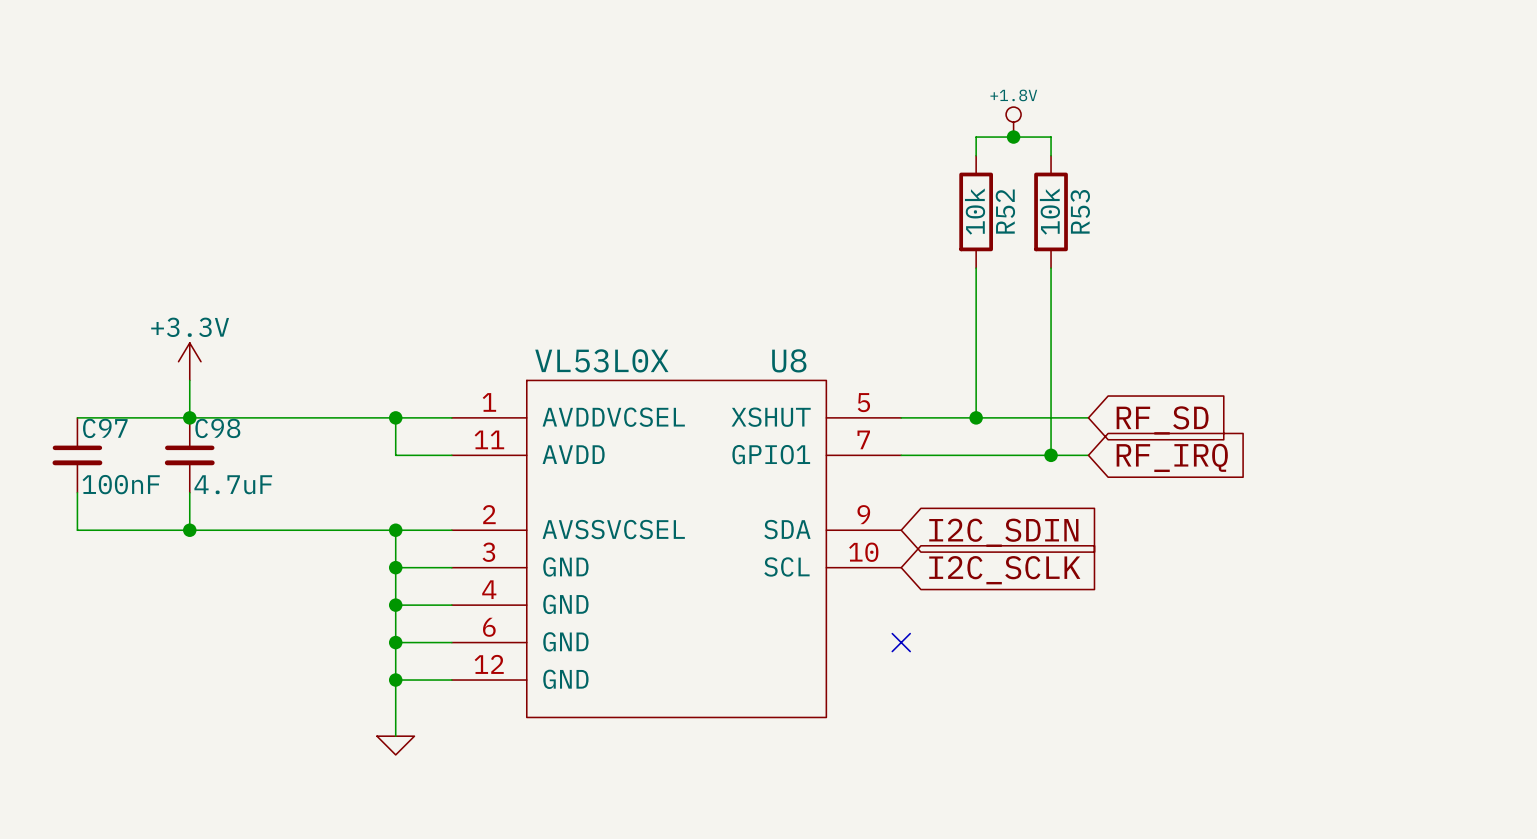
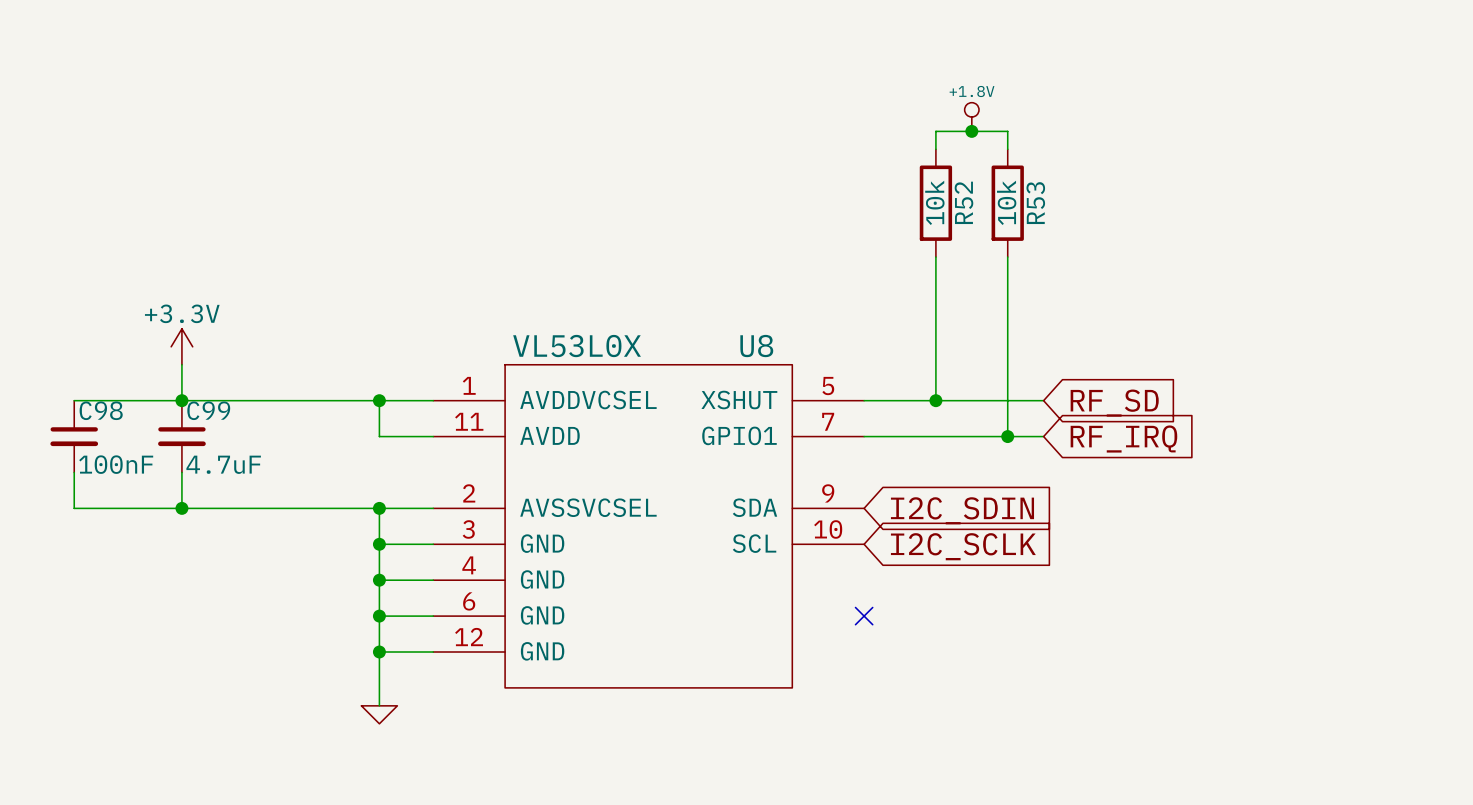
C97 name: C97 (105, 428) -> C98 (101, 410)
C98 name: C98 (217, 428) -> C99 (208, 410)

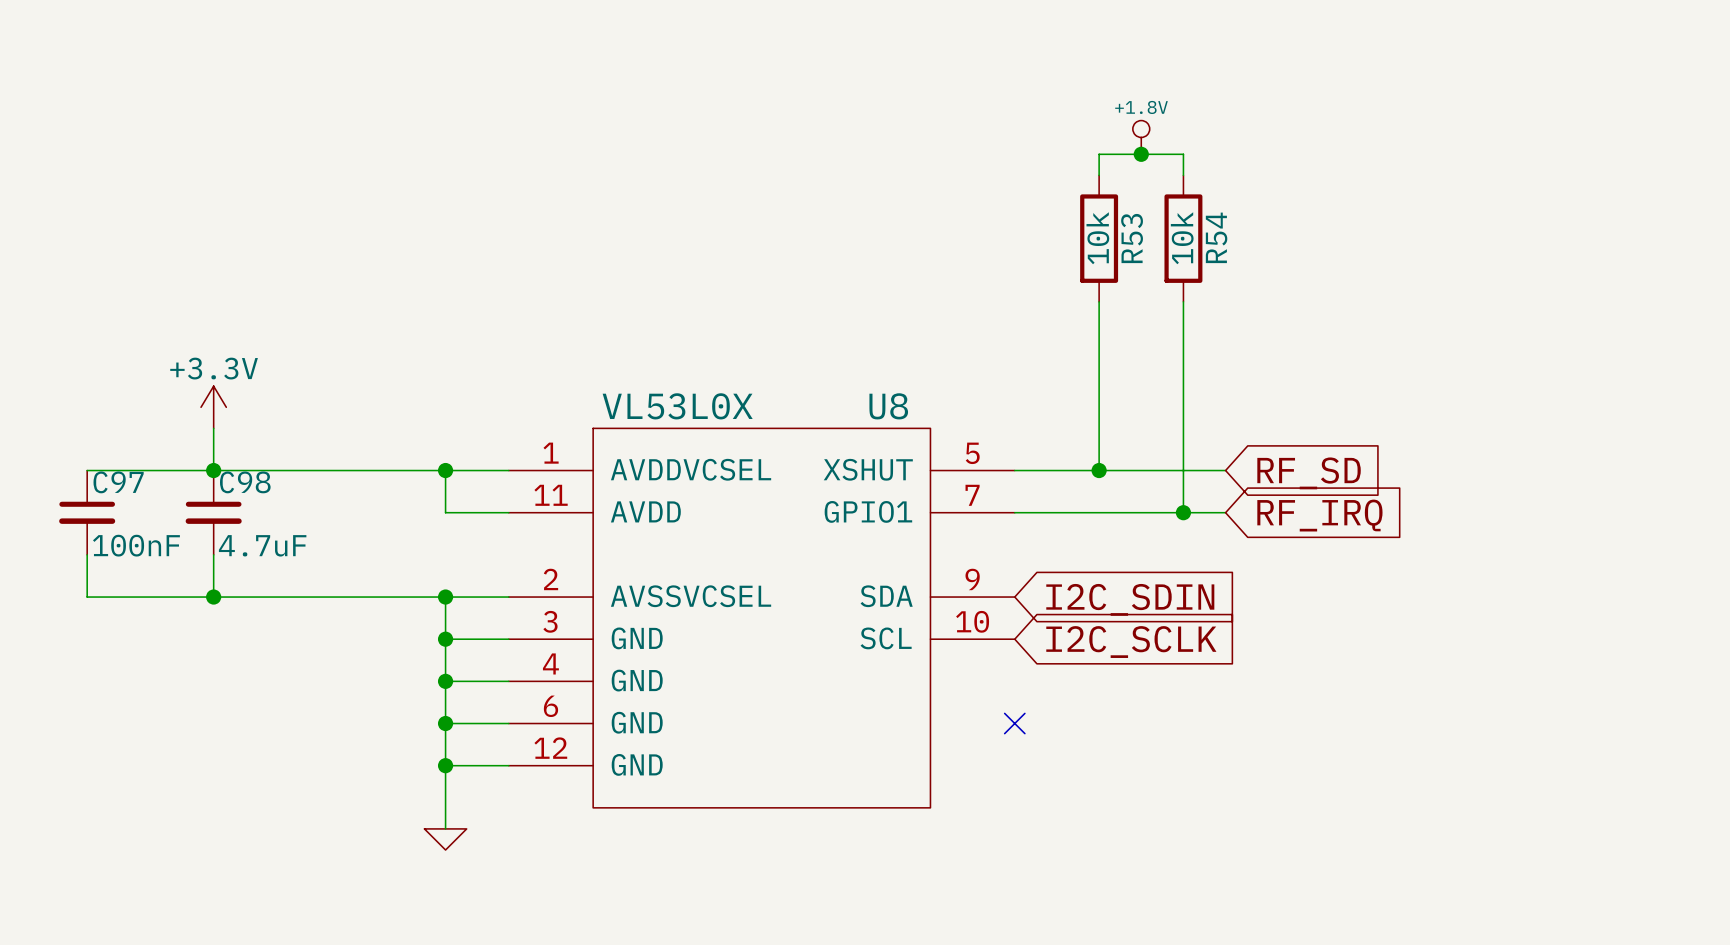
R52 name: R52 (963, 202) -> R53 (1132, 238)
R53 name: R53 (1035, 203) -> R54 (1216, 237)
C98 name: C98 (101, 410) -> C97 (118, 482)
C99 name: C99 (208, 410) -> C98 (245, 482)

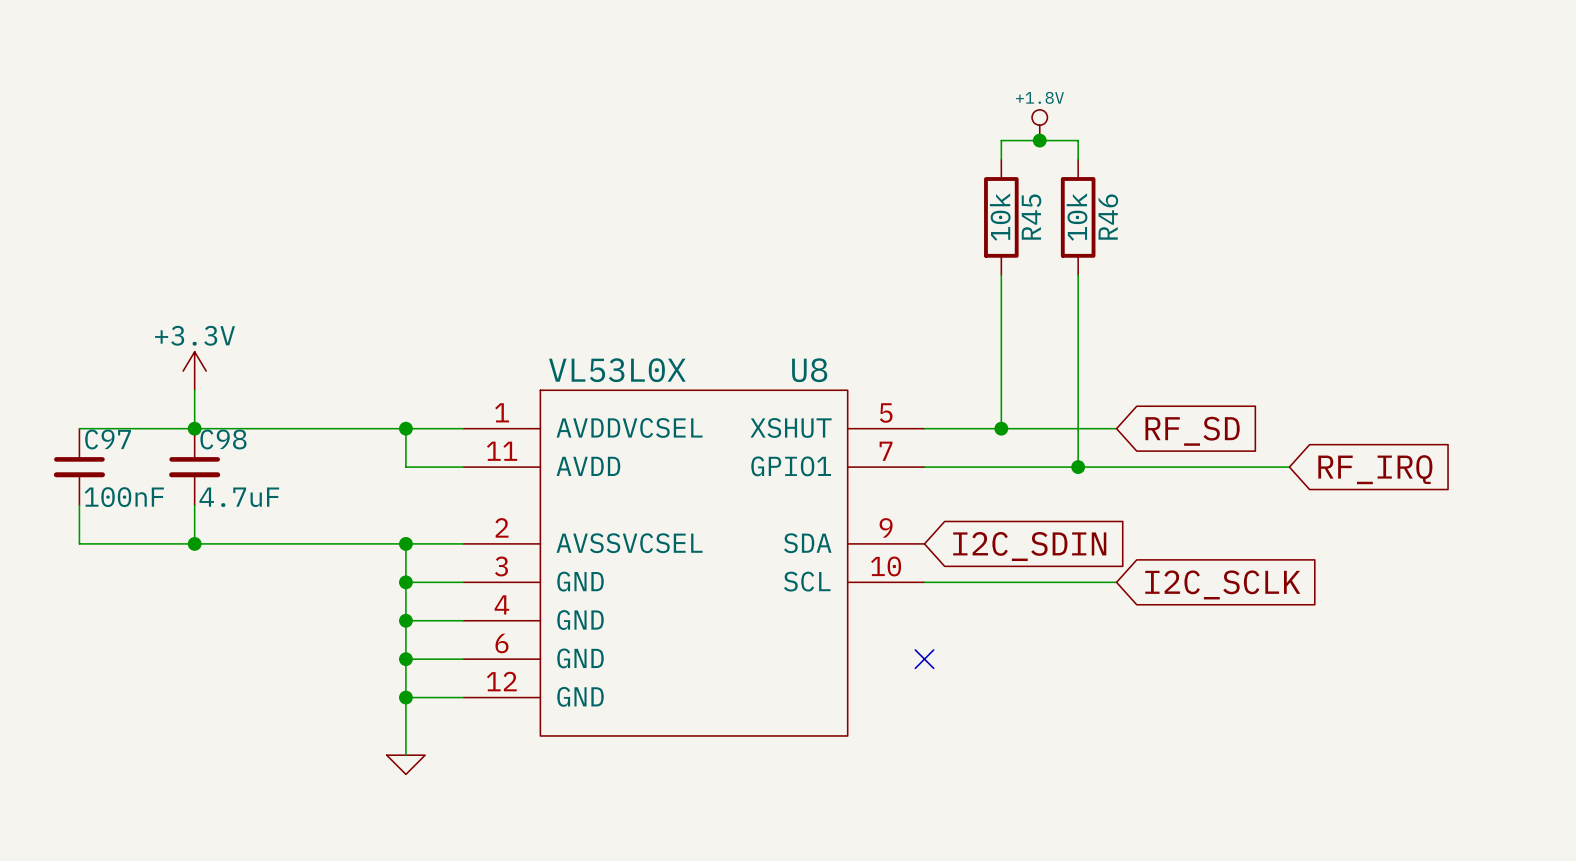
R54 name: R54 (1216, 237) -> R46 (1108, 217)
R53 name: R53 (1132, 238) -> R45 (1031, 217)
wire: none -> (1116, 467) (1289, 467)
global label position: RF_IRQ (1319, 515) -> RF_IRQ (1375, 469)
wire: none -> (924, 582) (1116, 582)
global label position: I2C_SCLK (1131, 642) -> I2C_SCLK (1222, 584)

